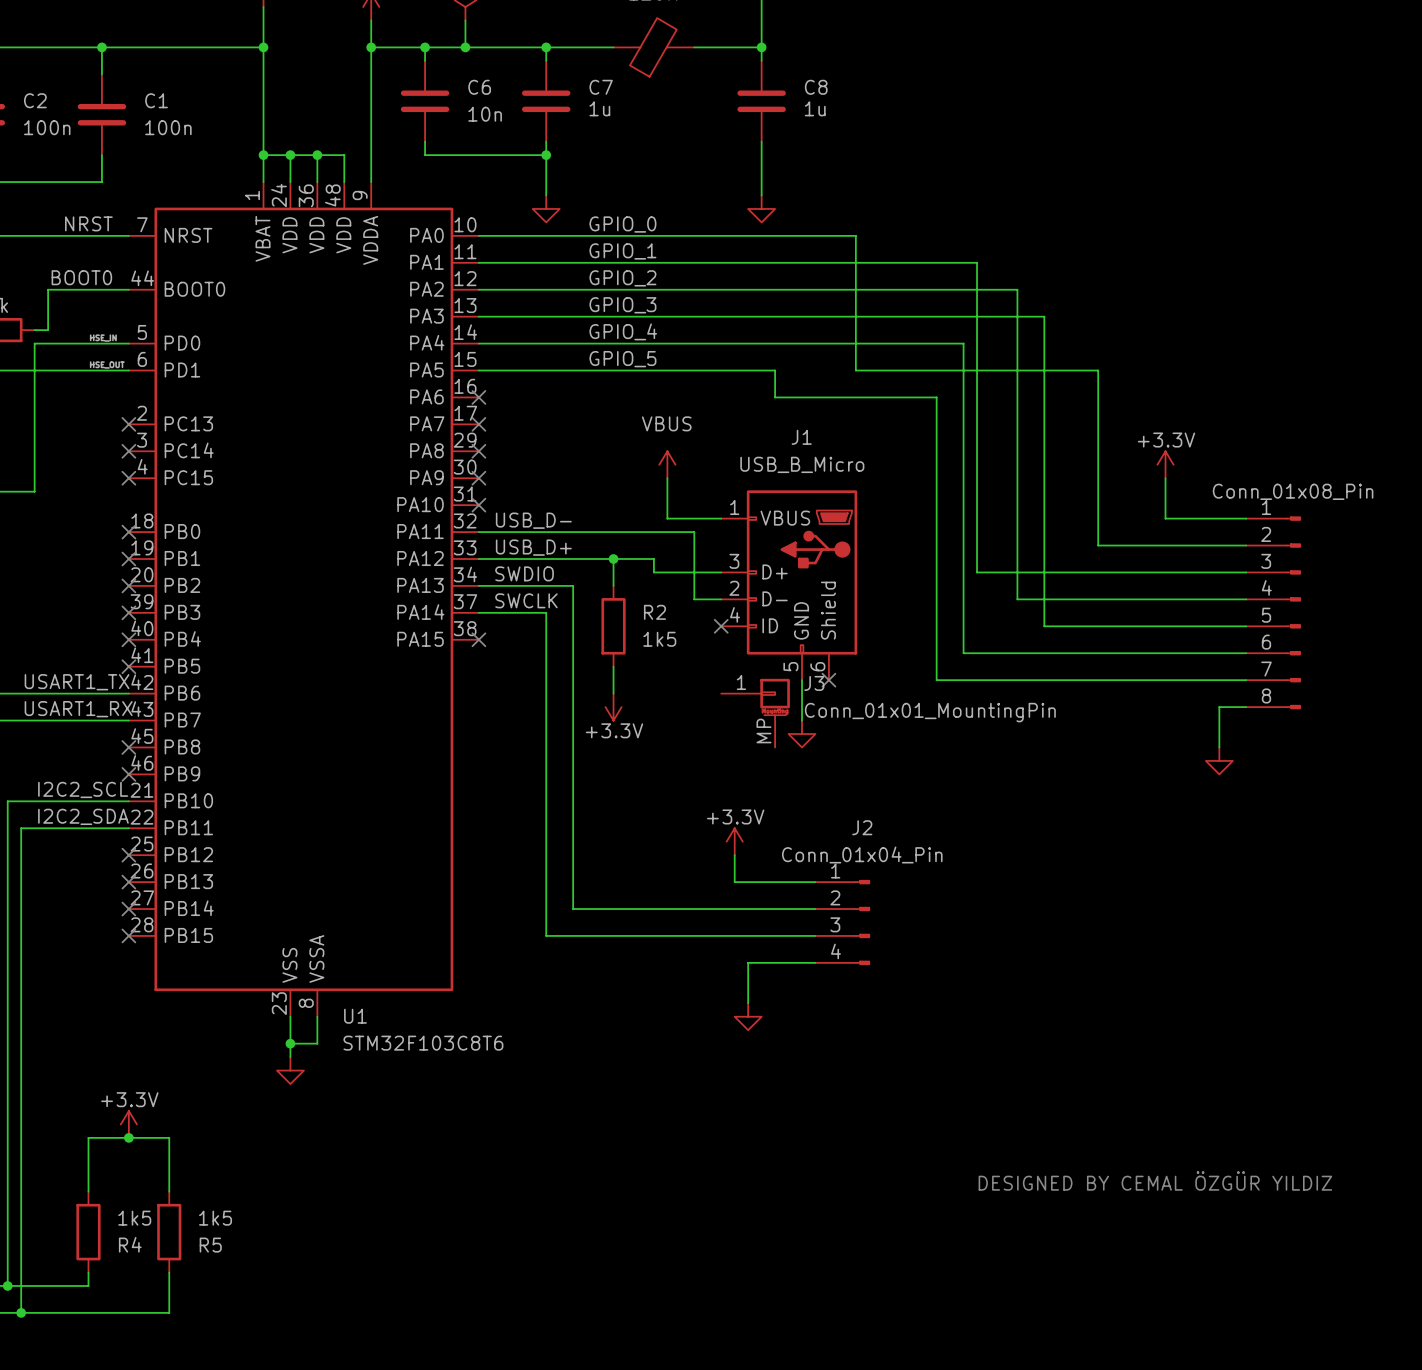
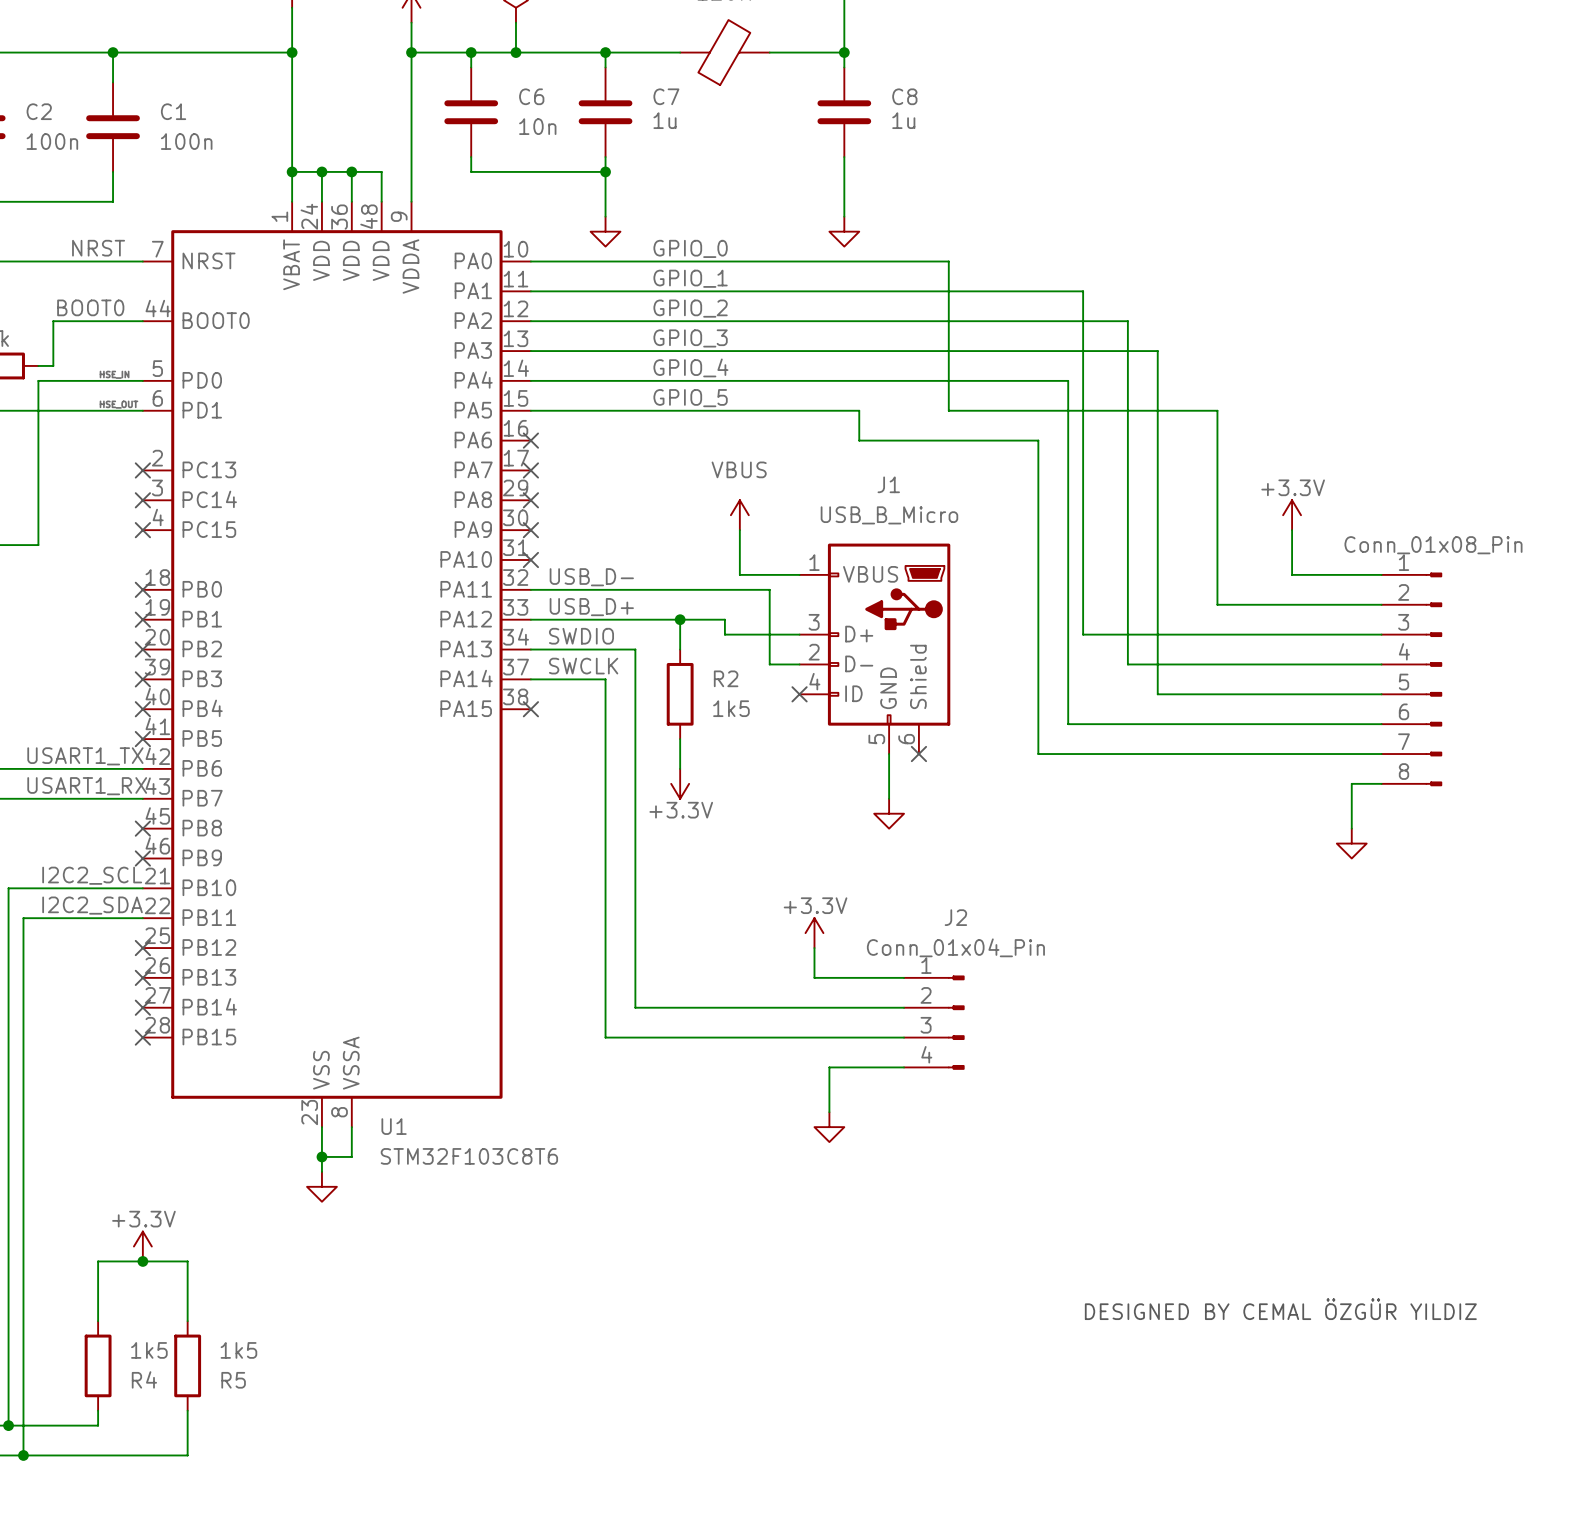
J3: Conn_01x01_MountingPin (755, 713) -> none

